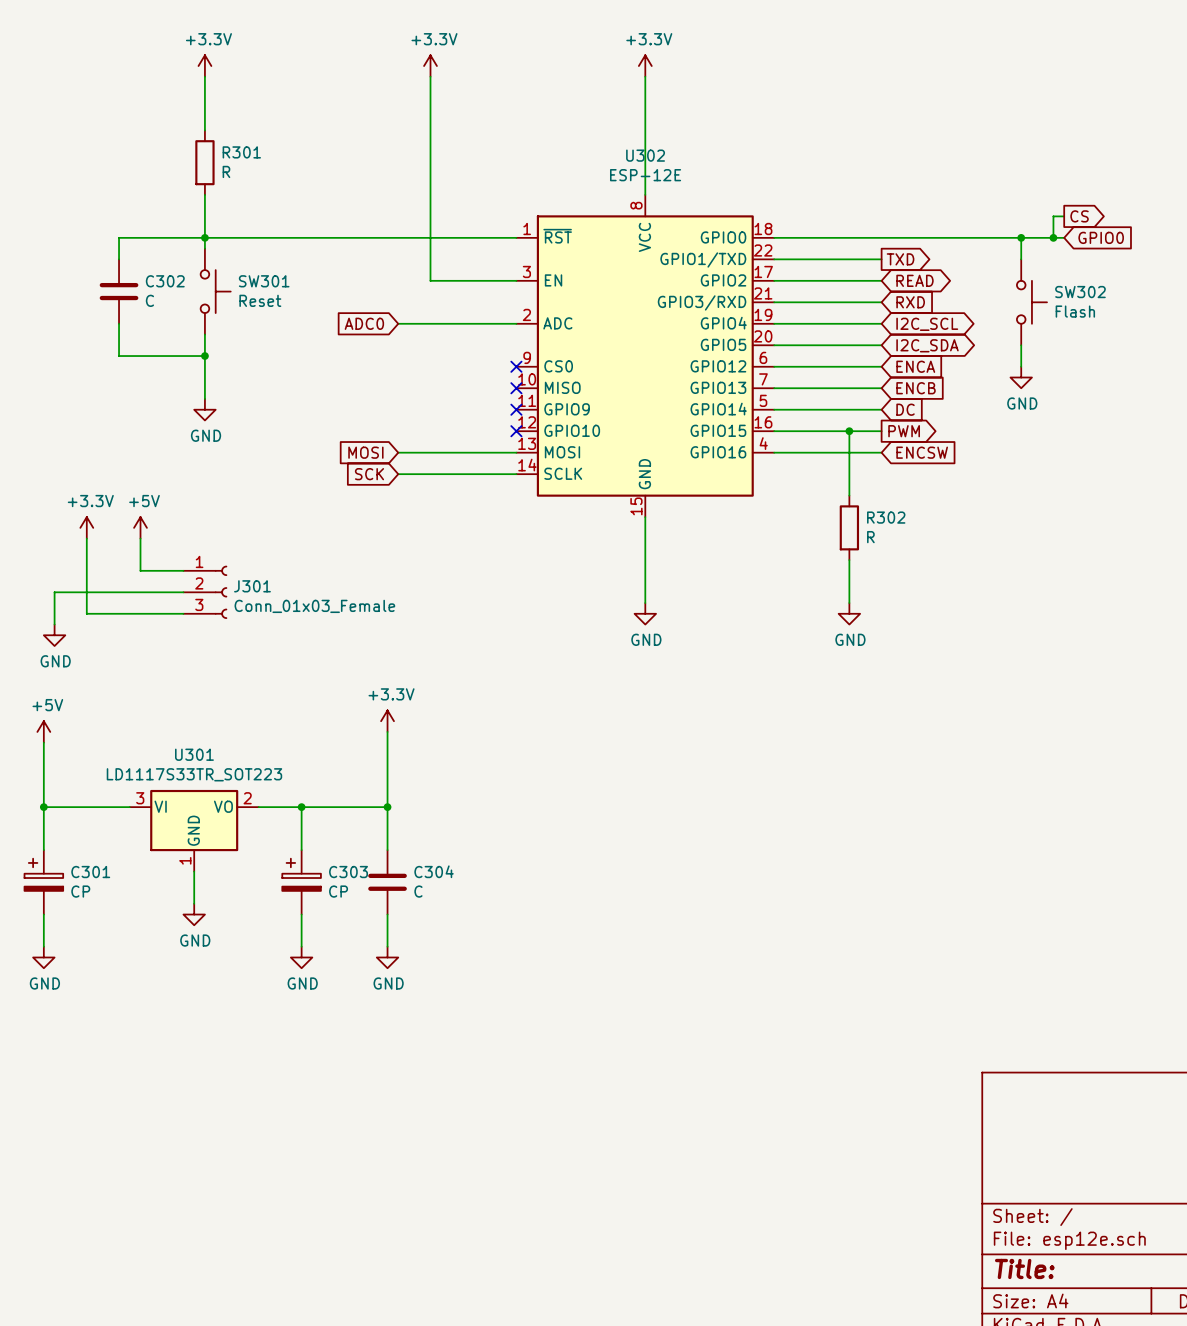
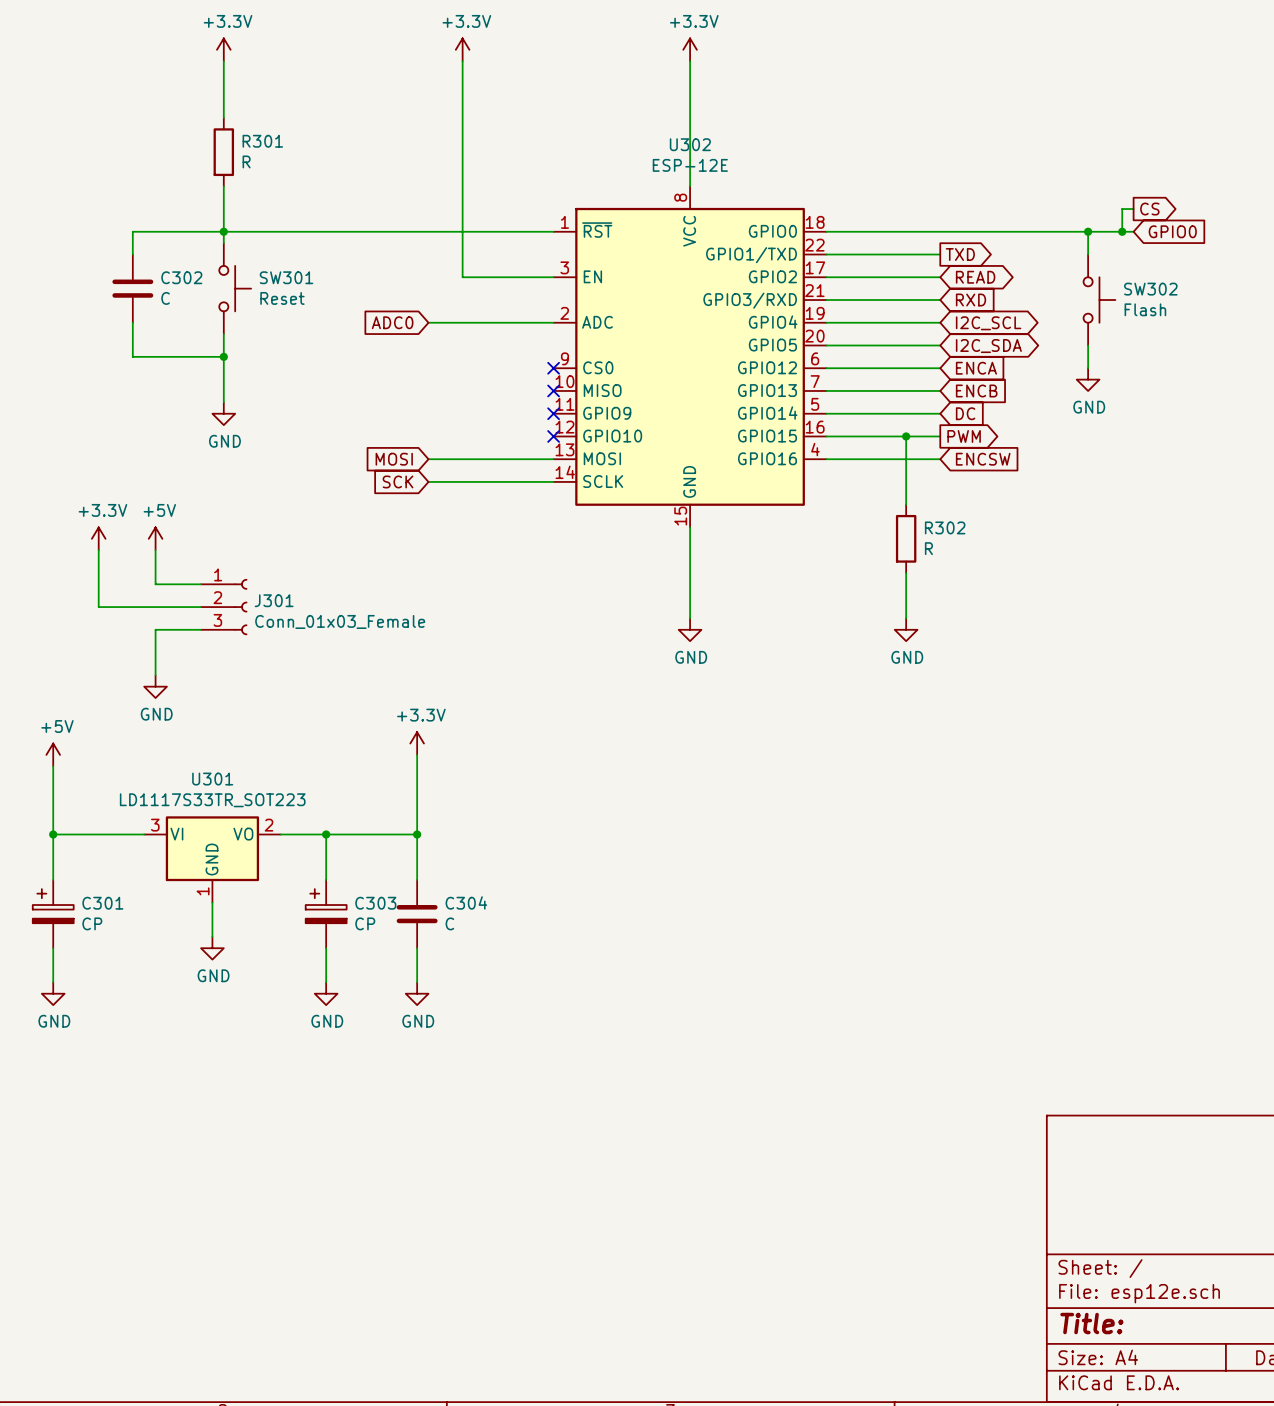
wire: (140, 613) (86, 613) (86, 592) (54, 592) (54, 624) -> (155, 629) (155, 675)
power symbol position: GND (54, 635) -> GND (155, 686)

